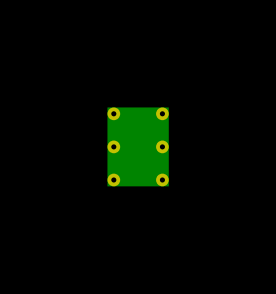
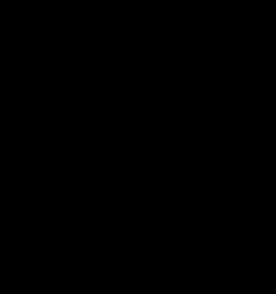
part: (138, 146) -> none

